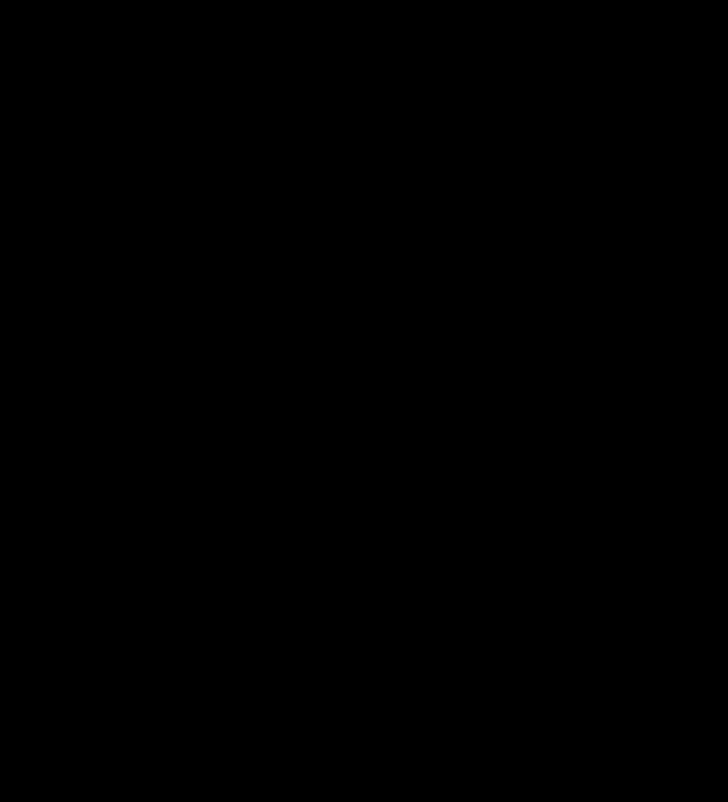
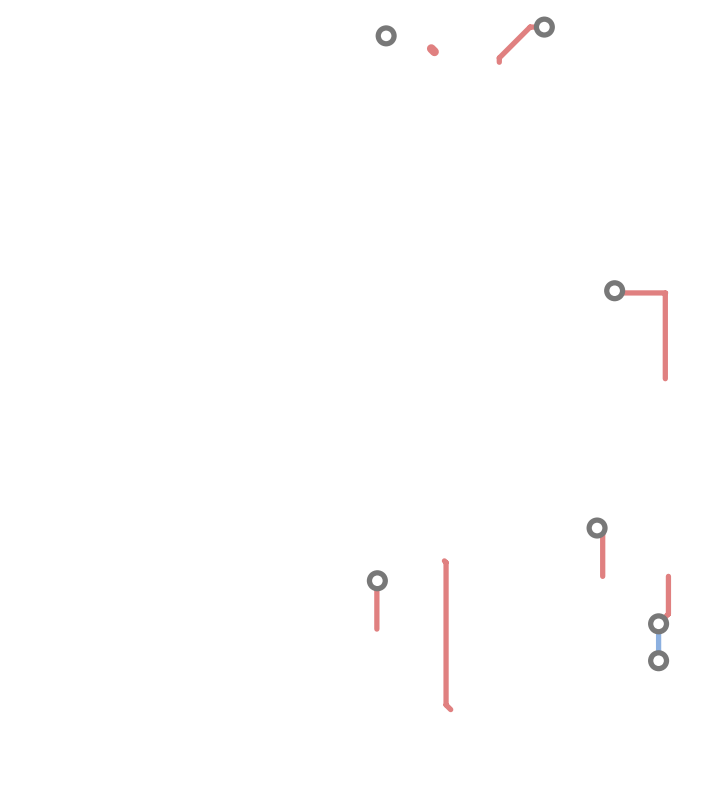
top track: none -> (544, 27) (530, 27) (499, 57) (499, 62)
via: none -> (544, 27)
via: none -> (386, 35)
top track: none -> (431, 48) (434, 51)
top track: none -> (614, 290) (616, 292) (665, 292)
via: none -> (614, 290)
top track: none -> (665, 293) (665, 378)
top track: none -> (597, 528) (602, 533) (602, 576)
via: none -> (597, 528)
top track: none -> (444, 560) (446, 562) (446, 704) (450, 709)
top track: none -> (668, 576) (668, 613) (658, 623)
top track: none -> (377, 580) (376, 629)
via: none -> (377, 580)
bottom track: none -> (658, 623) (658, 660)
via: none -> (658, 623)
via: none -> (658, 660)

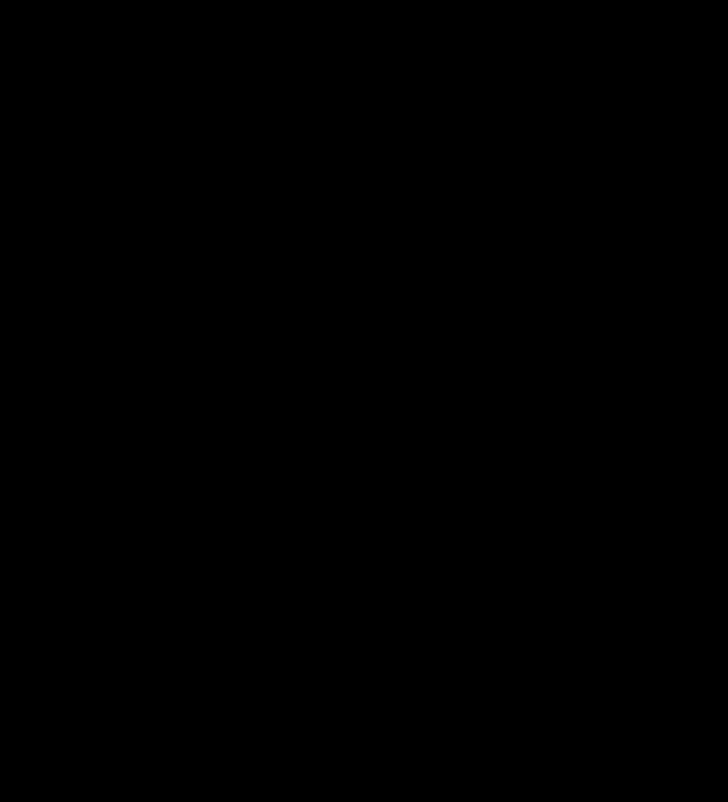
top track: (544, 27) (530, 27) (499, 57) (499, 62) -> none
via: (544, 27) -> none
via: (386, 35) -> none
top track: (431, 48) (434, 51) -> none
top track: (614, 290) (616, 292) (665, 292) -> none
via: (614, 290) -> none
top track: (665, 293) (665, 378) -> none
top track: (597, 528) (602, 533) (602, 576) -> none
via: (597, 528) -> none
top track: (444, 560) (446, 562) (446, 704) (450, 709) -> none
top track: (668, 576) (668, 613) (658, 623) -> none
top track: (377, 580) (376, 629) -> none
via: (377, 580) -> none
bottom track: (658, 623) (658, 660) -> none
via: (658, 623) -> none
via: (658, 660) -> none

